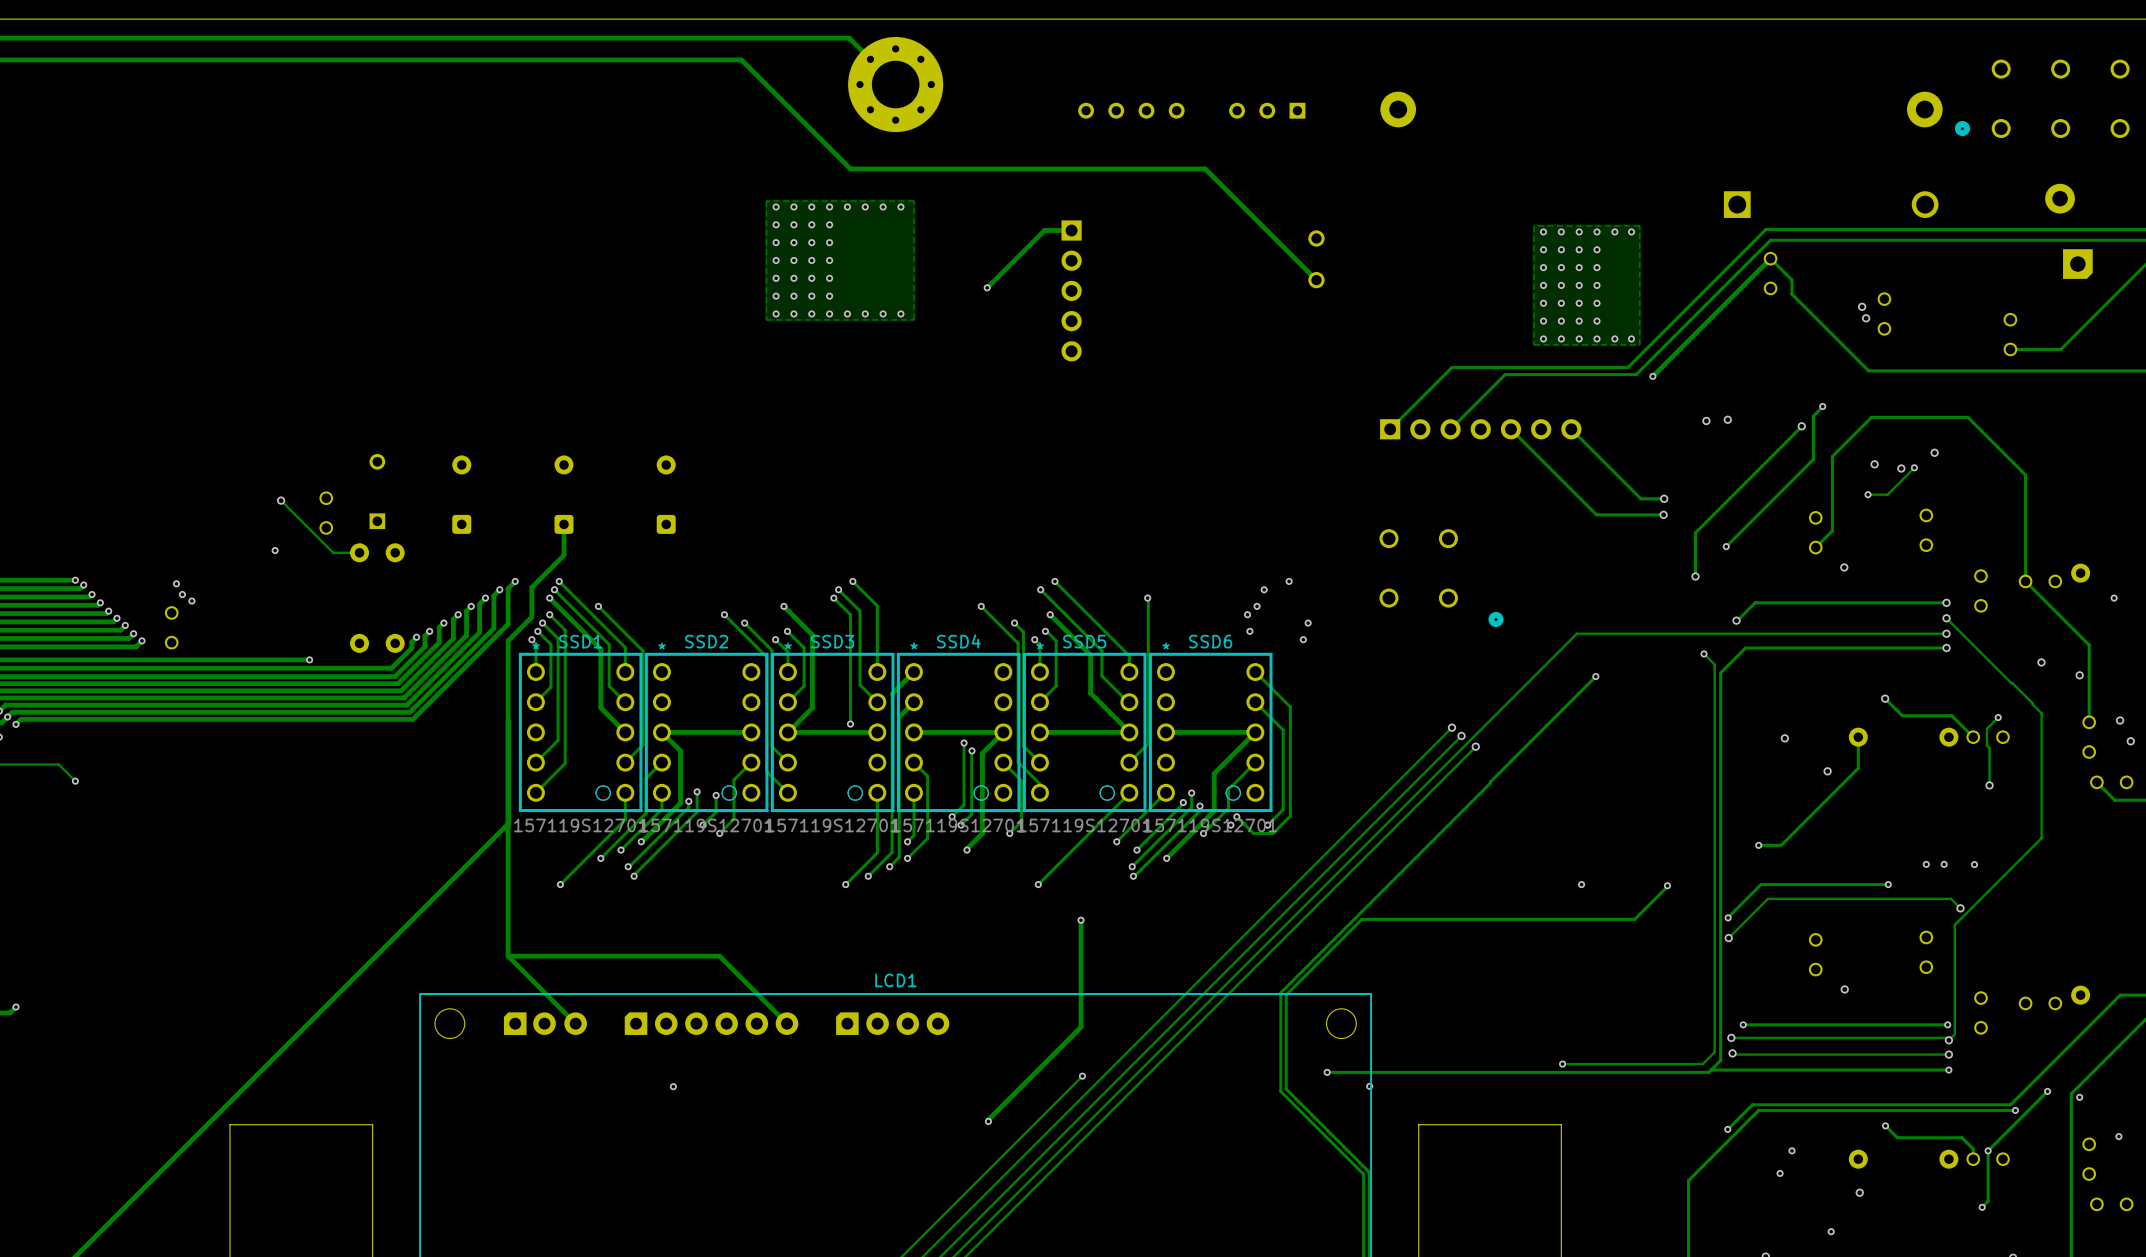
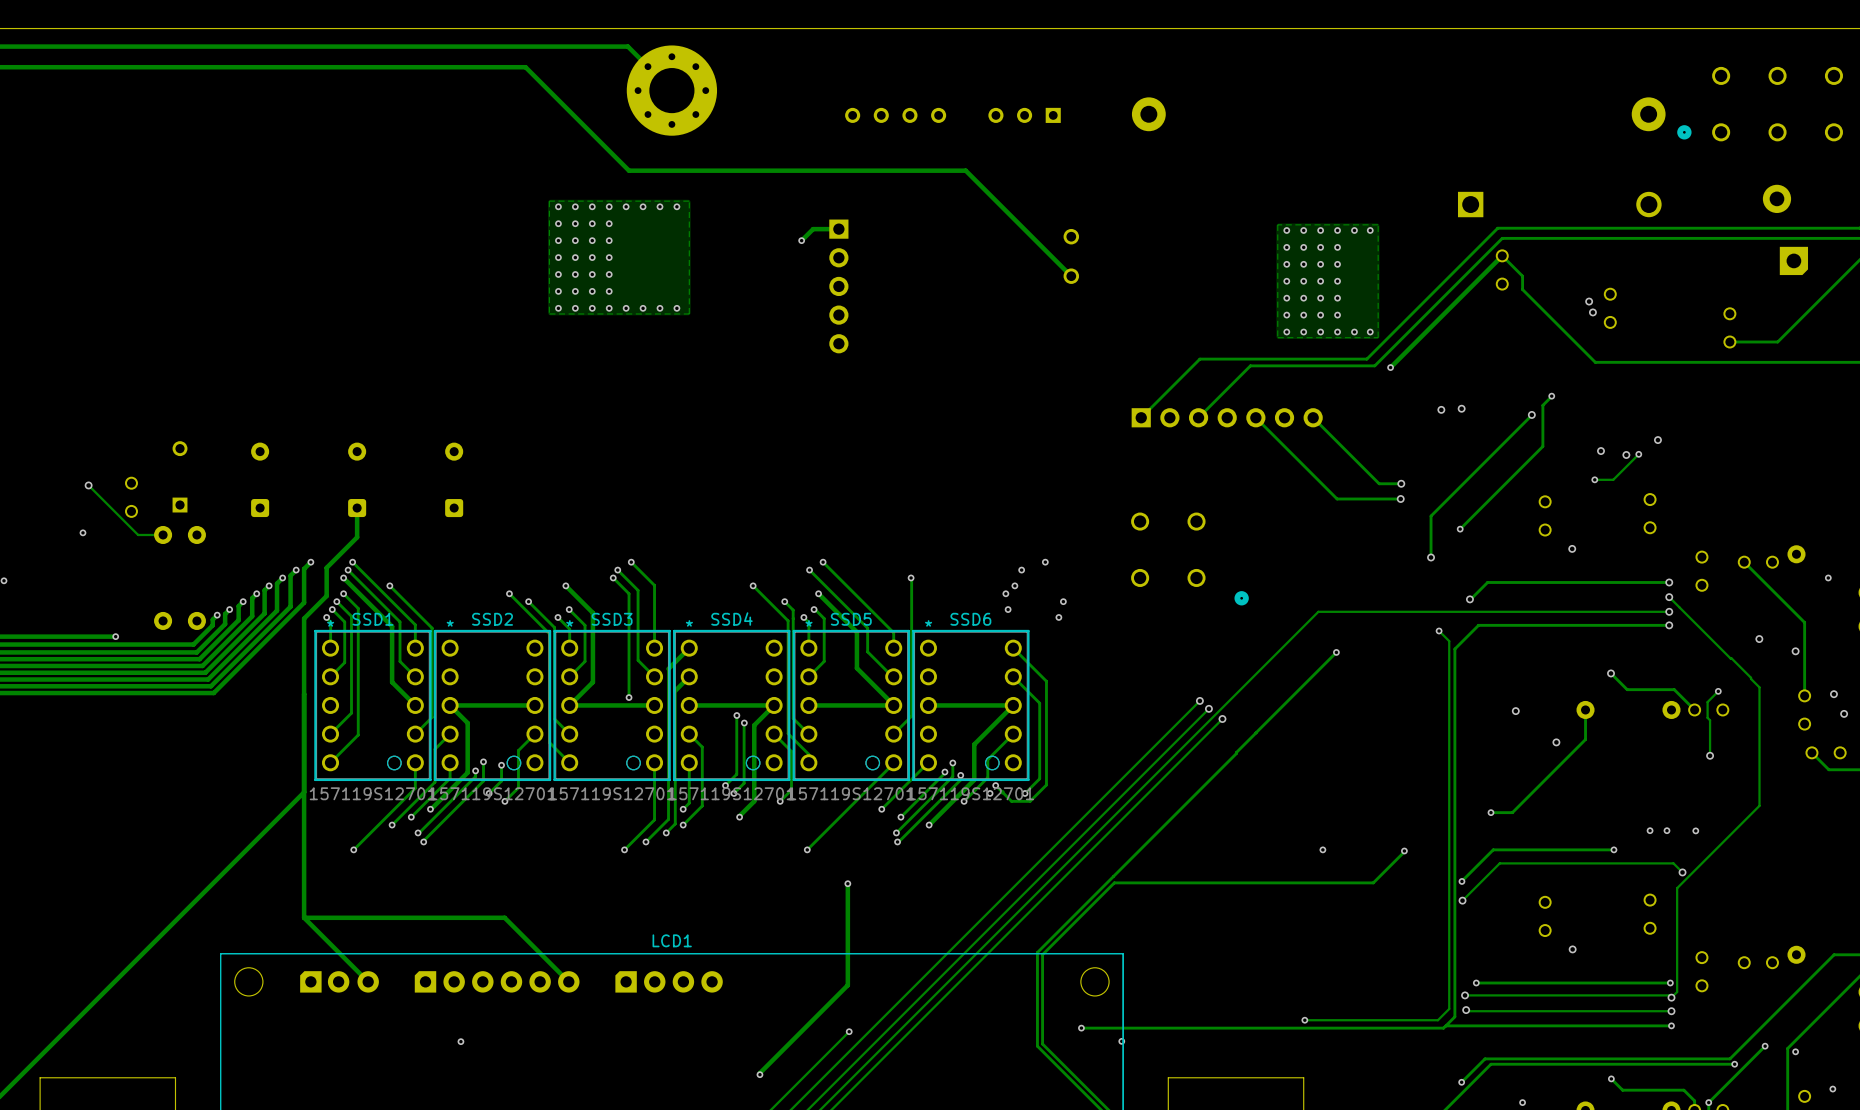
track: (1032, 242) (987, 287) -> none
via position: (987, 287) -> (801, 240)
track: (1815, 547) (1832, 530) (1832, 456) (1871, 417) (1967, 417) (2025, 475) (2025, 581) -> none

